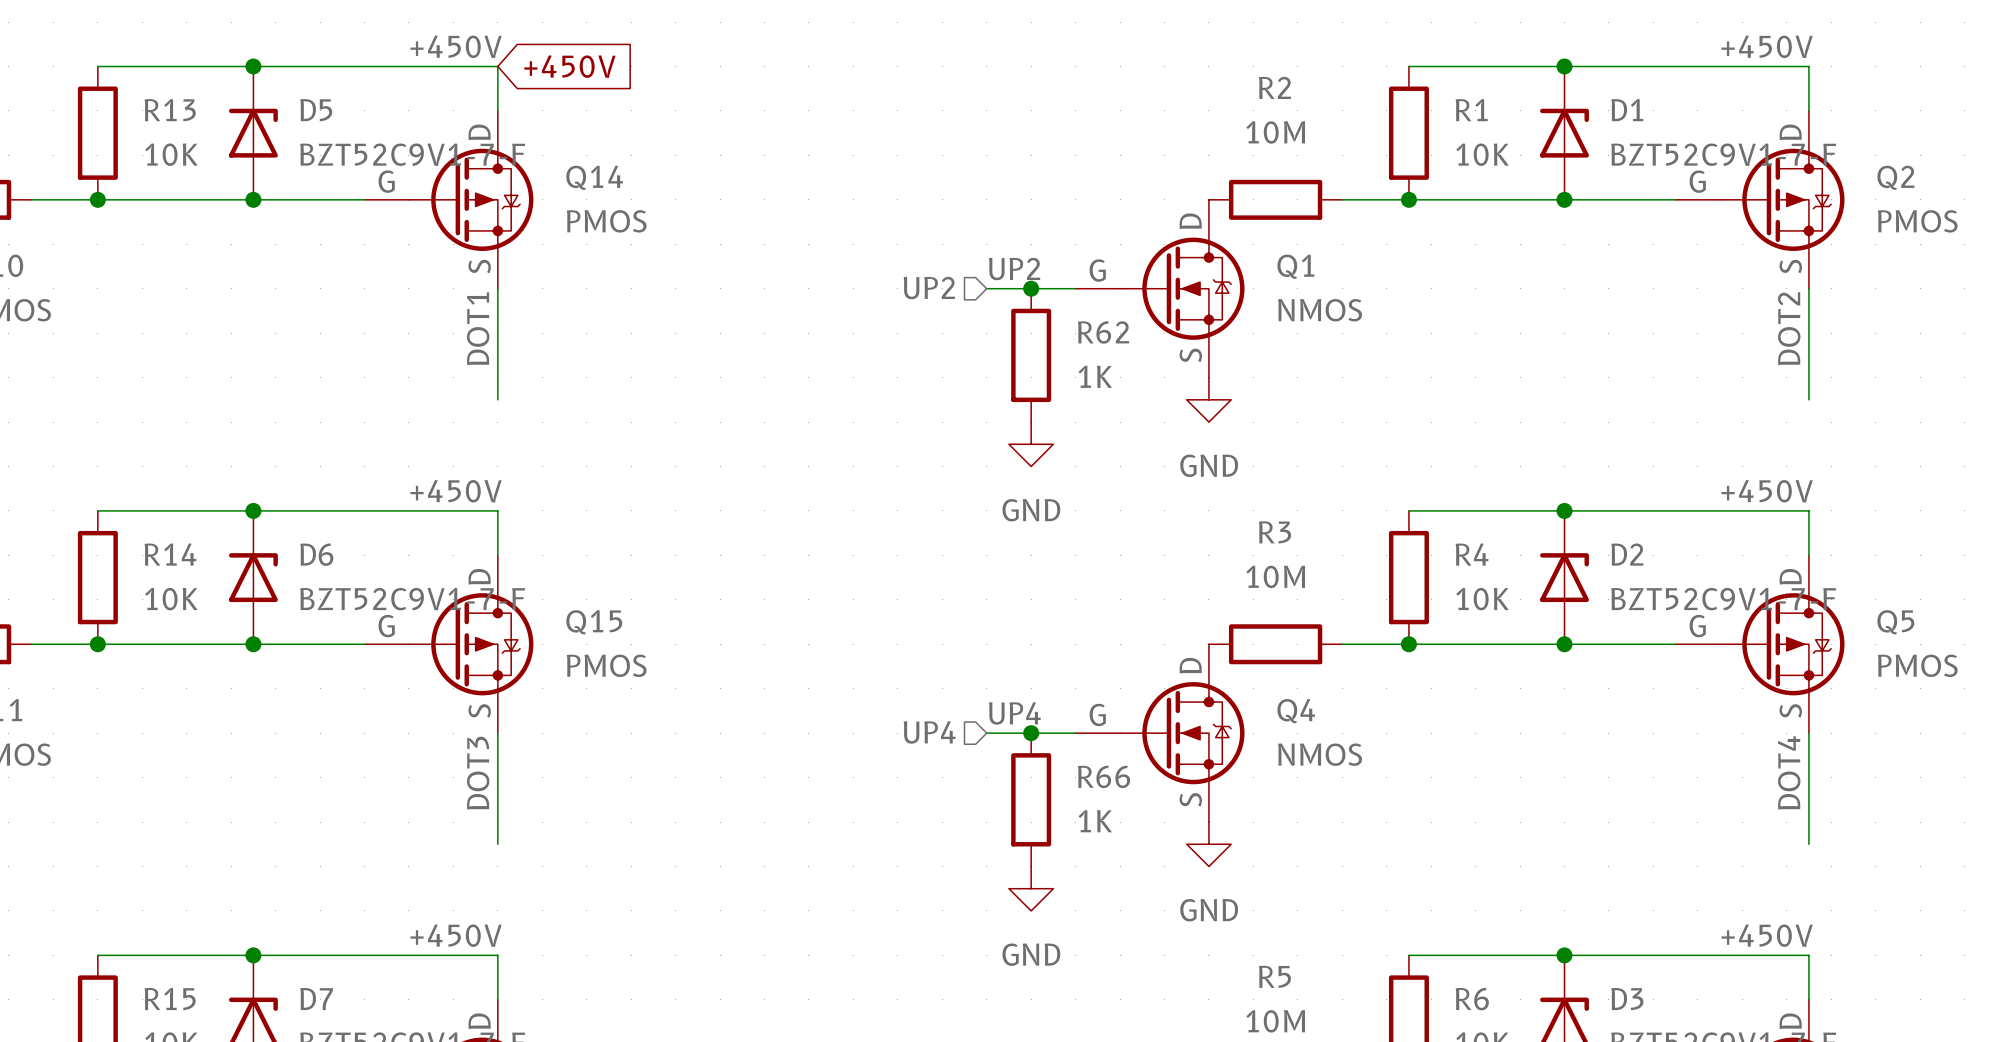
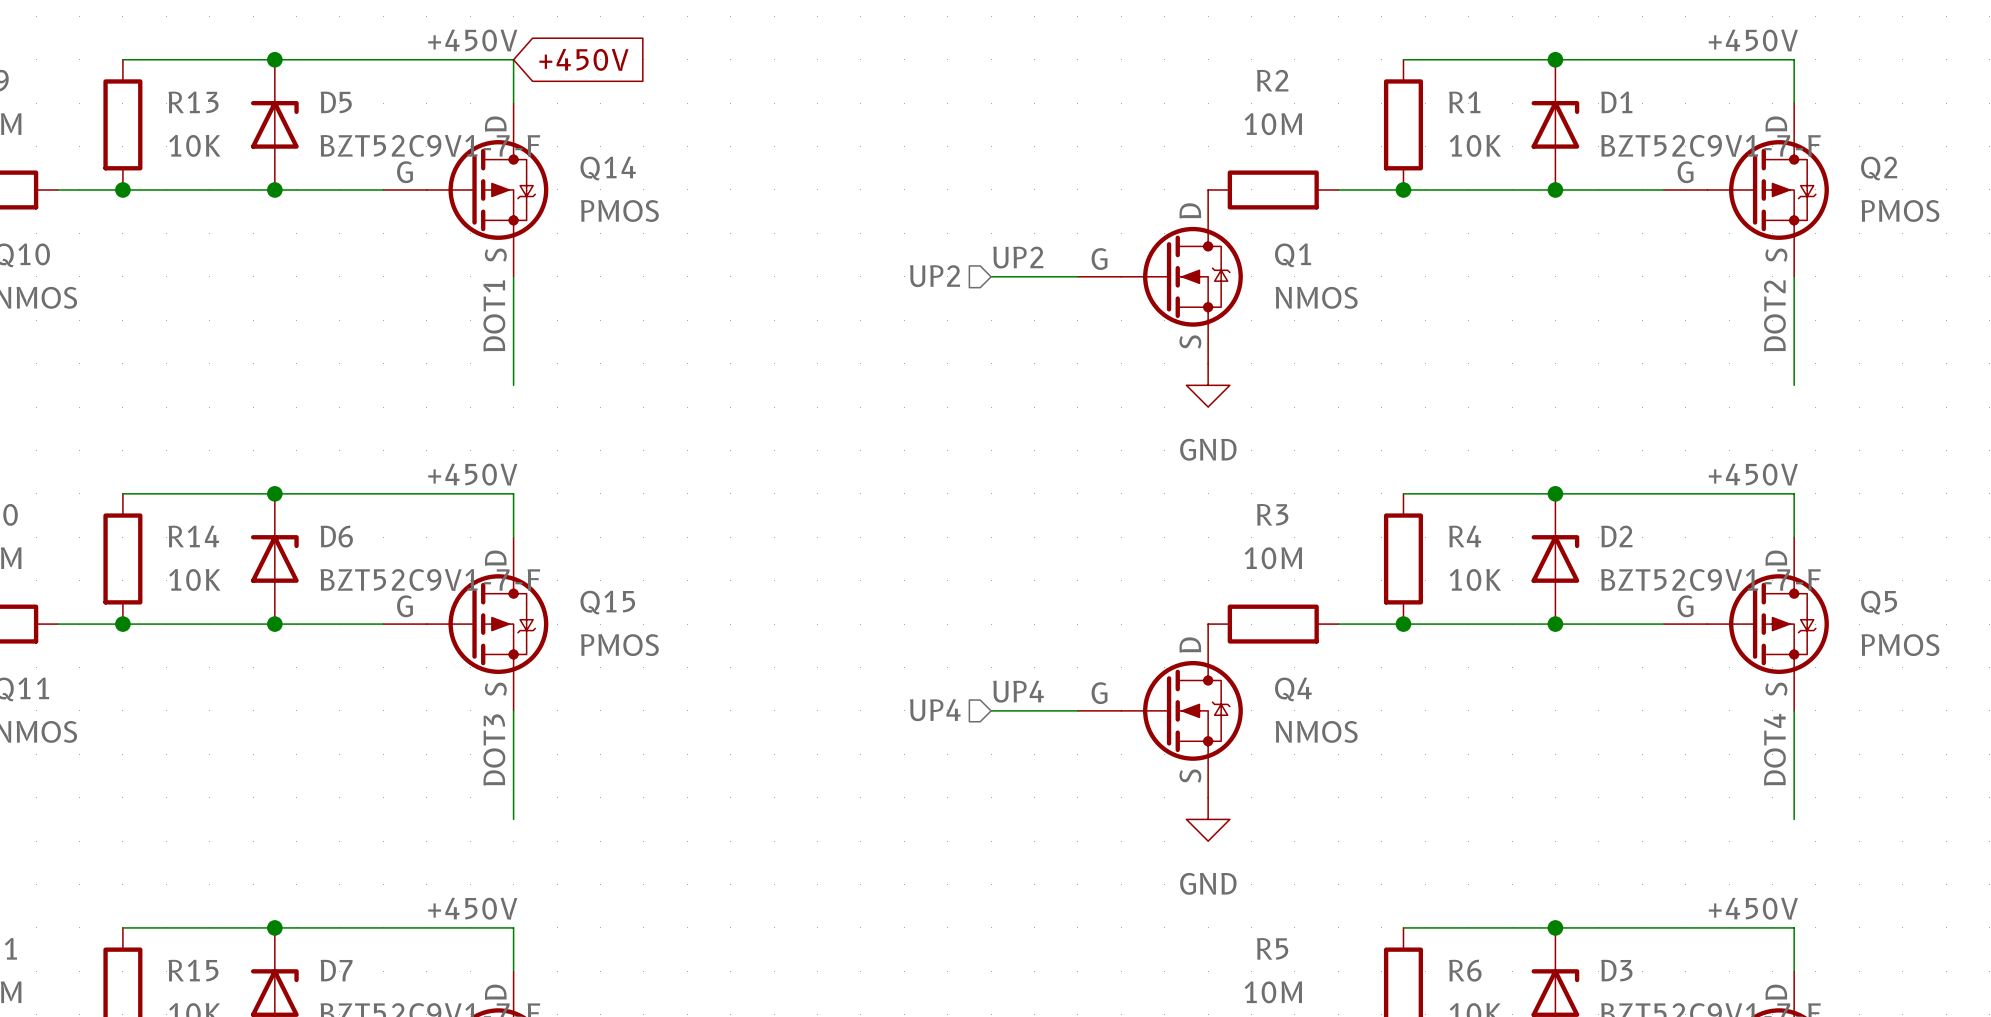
junction: (1031, 288) -> none
R62: 1K (1031, 355) -> none
power symbol: GND (1031, 444) -> none
junction: (1031, 733) -> none
R66: 1K (1031, 799) -> none
power symbol: GND (1031, 888) -> none

